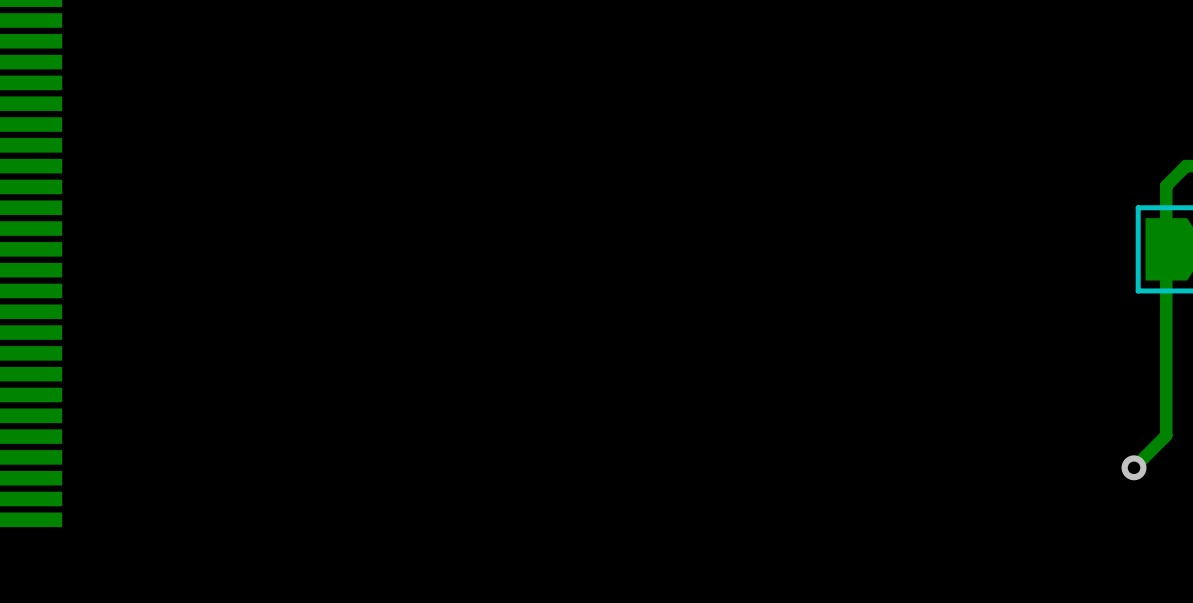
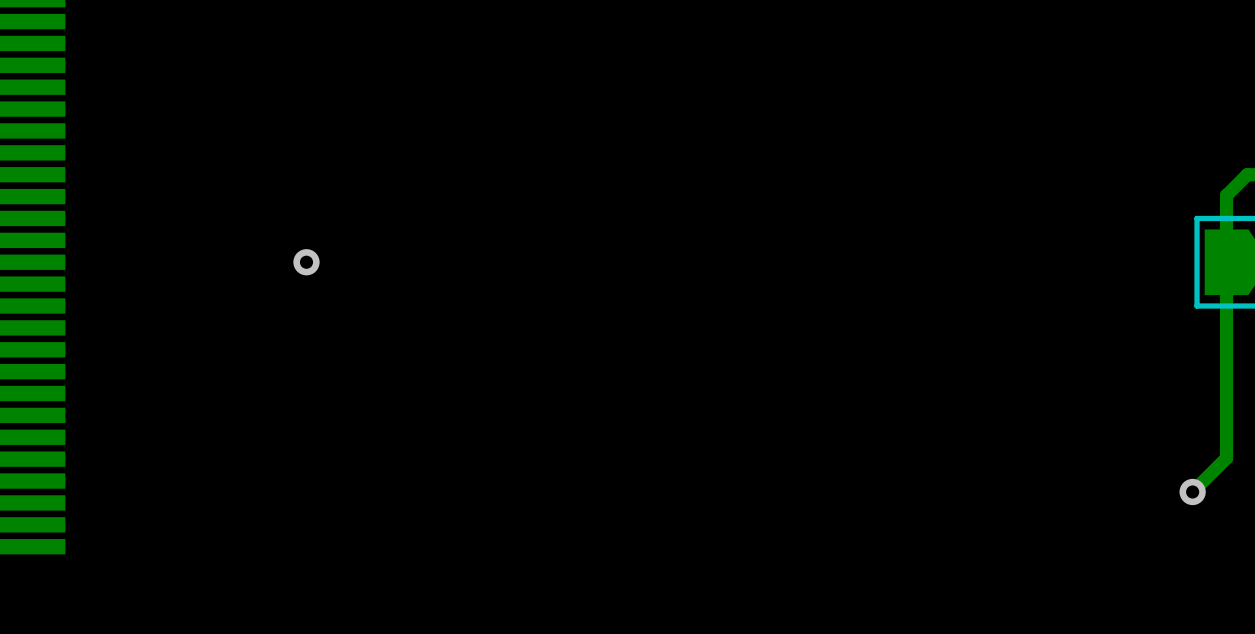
via: none -> (306, 262)

